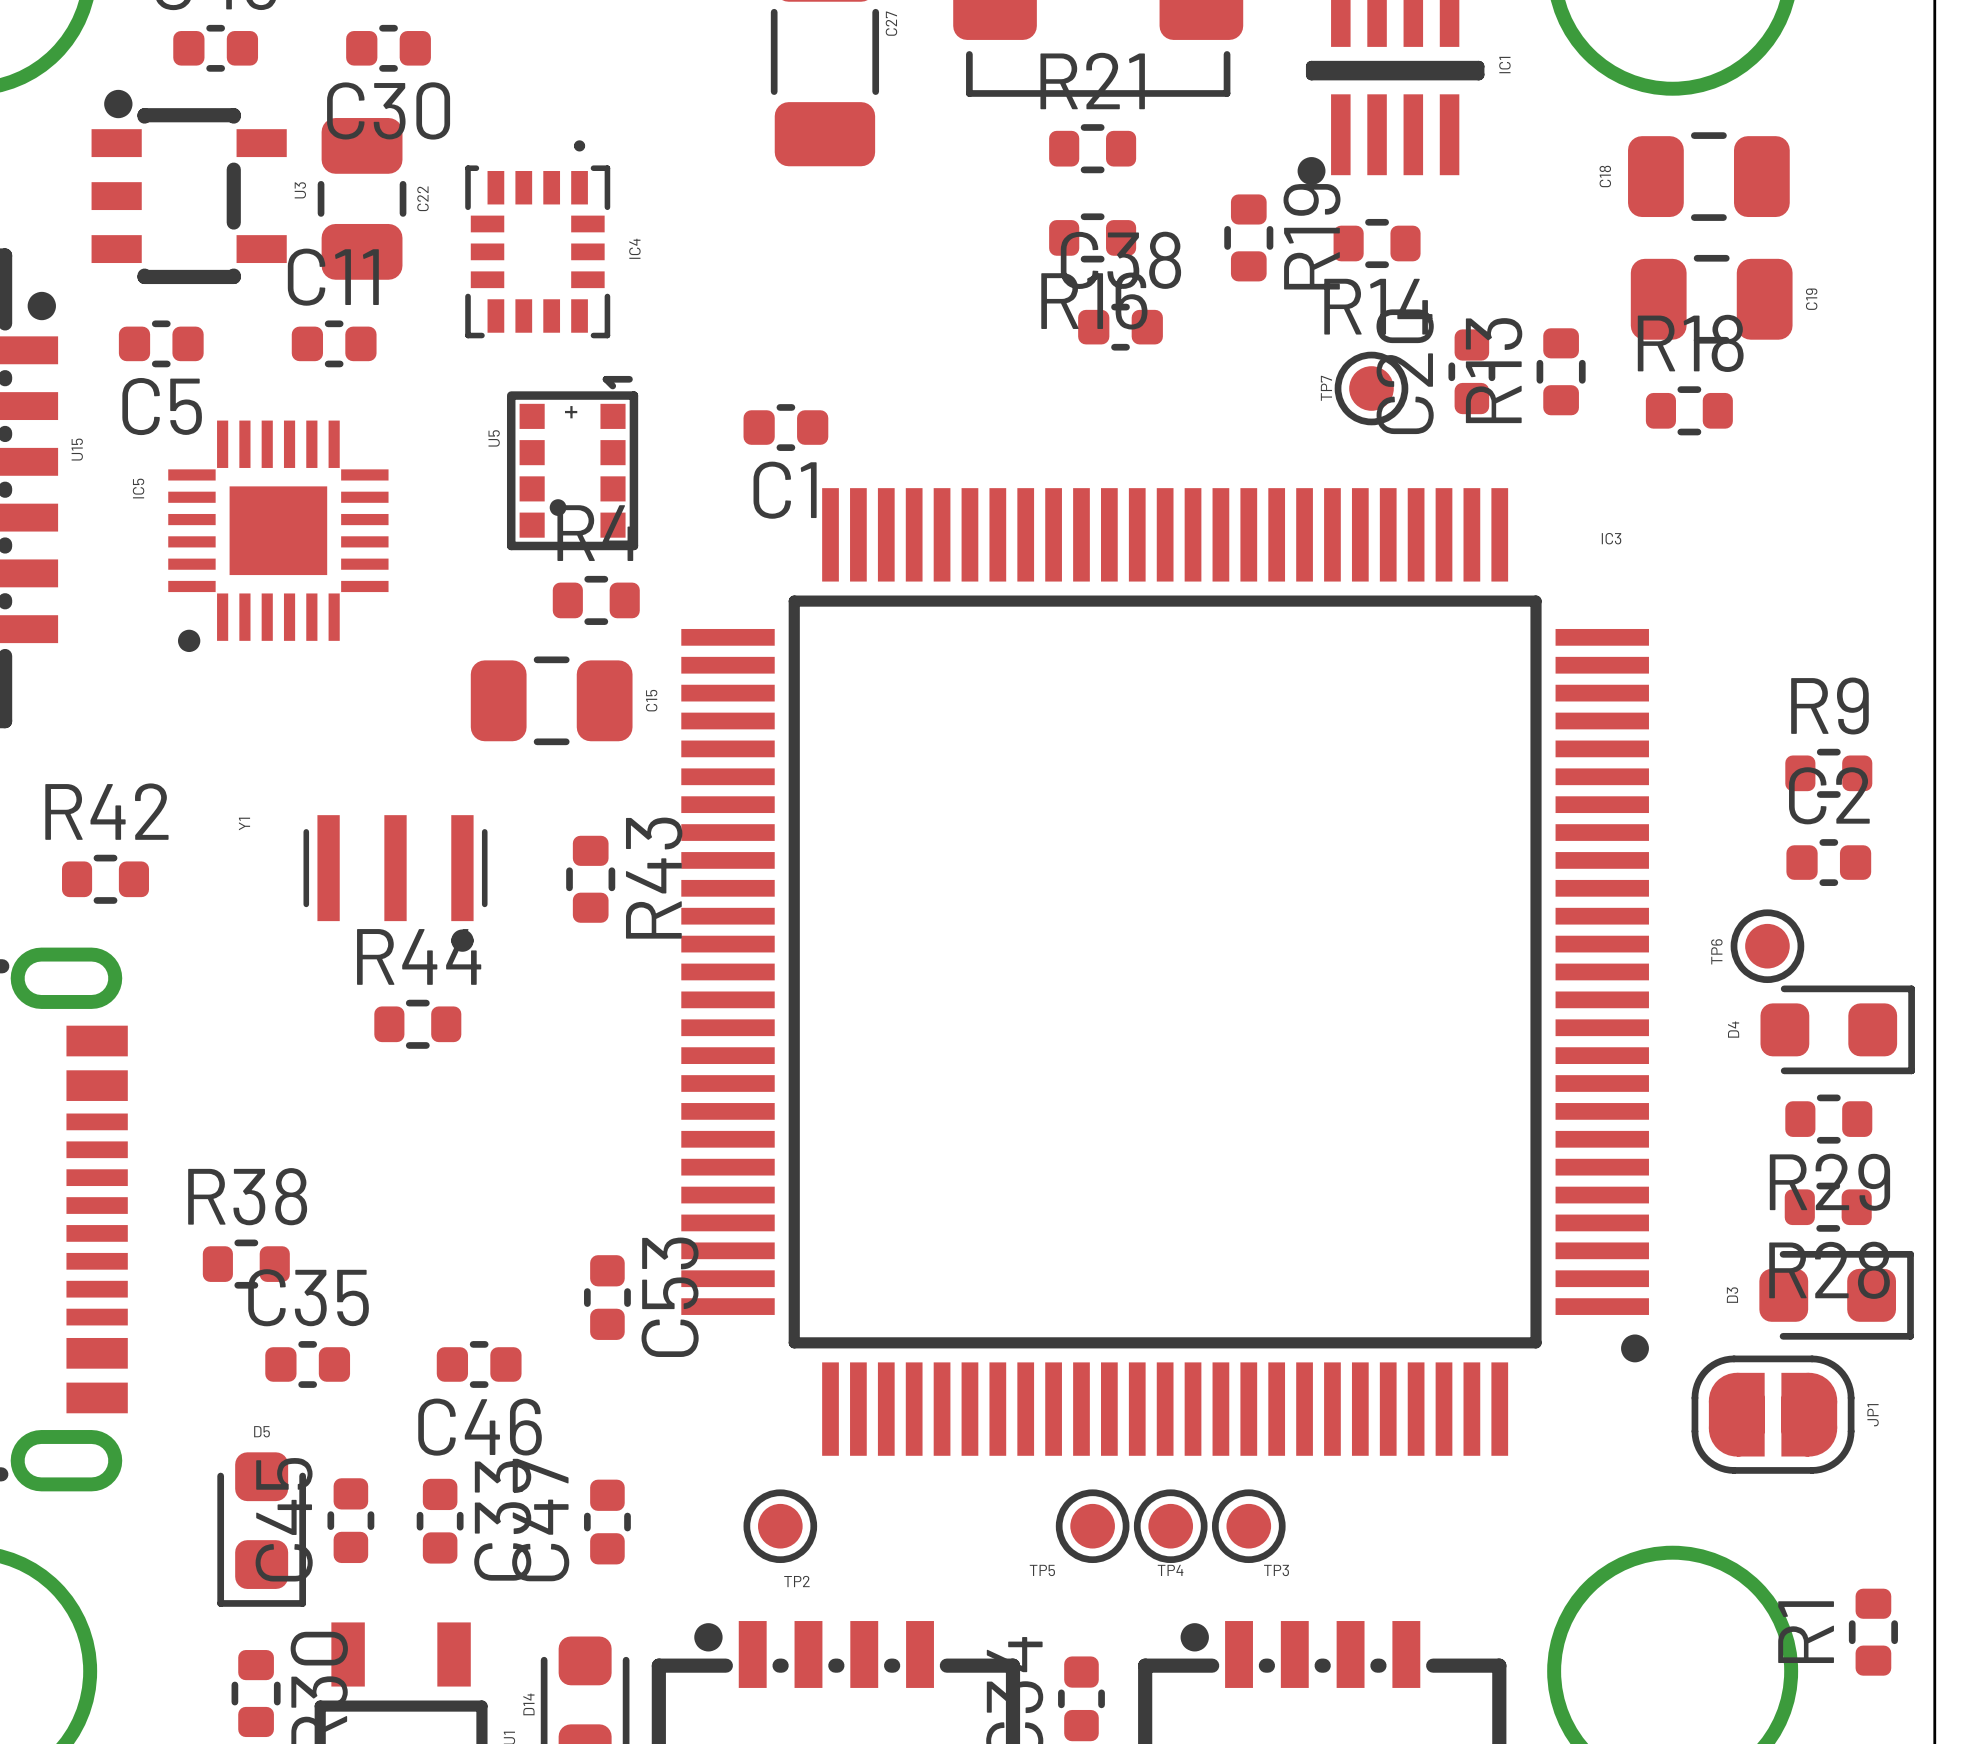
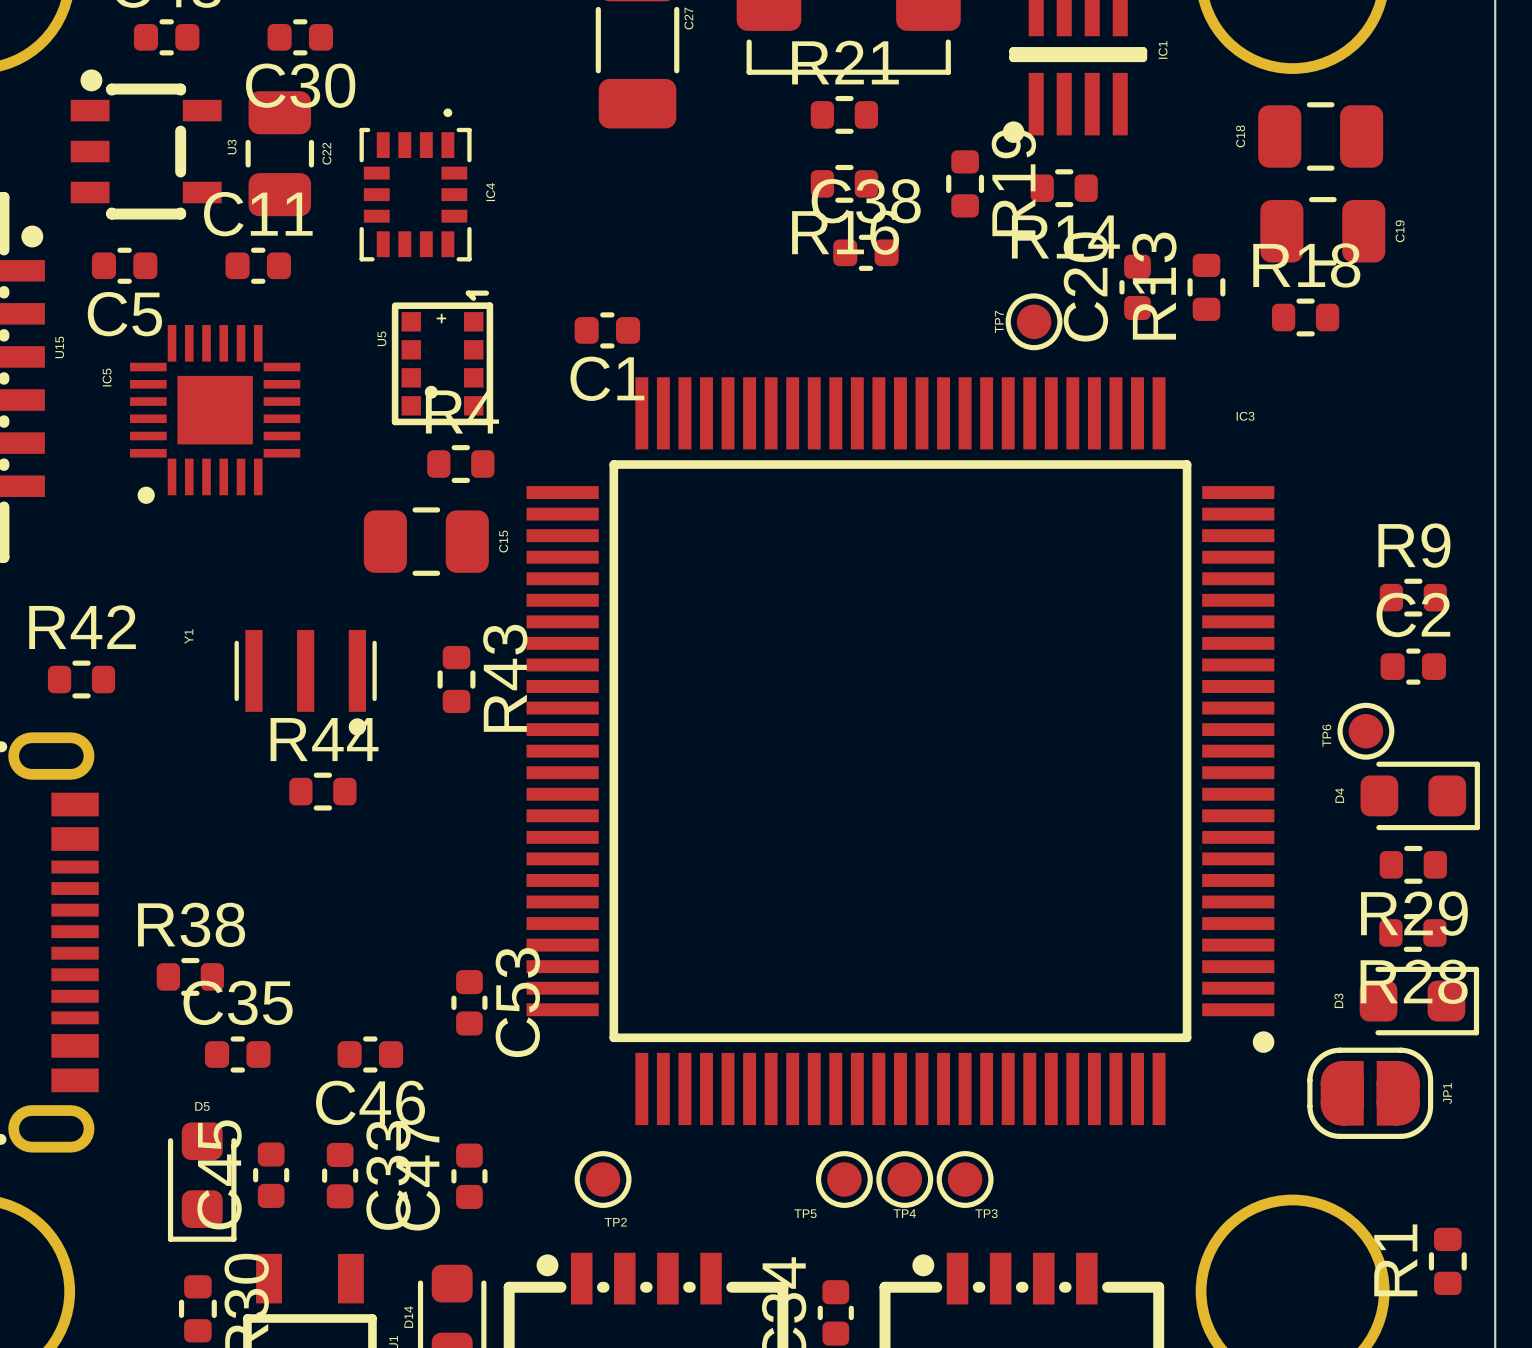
TP7 position: (1371, 388) -> (1034, 321)

